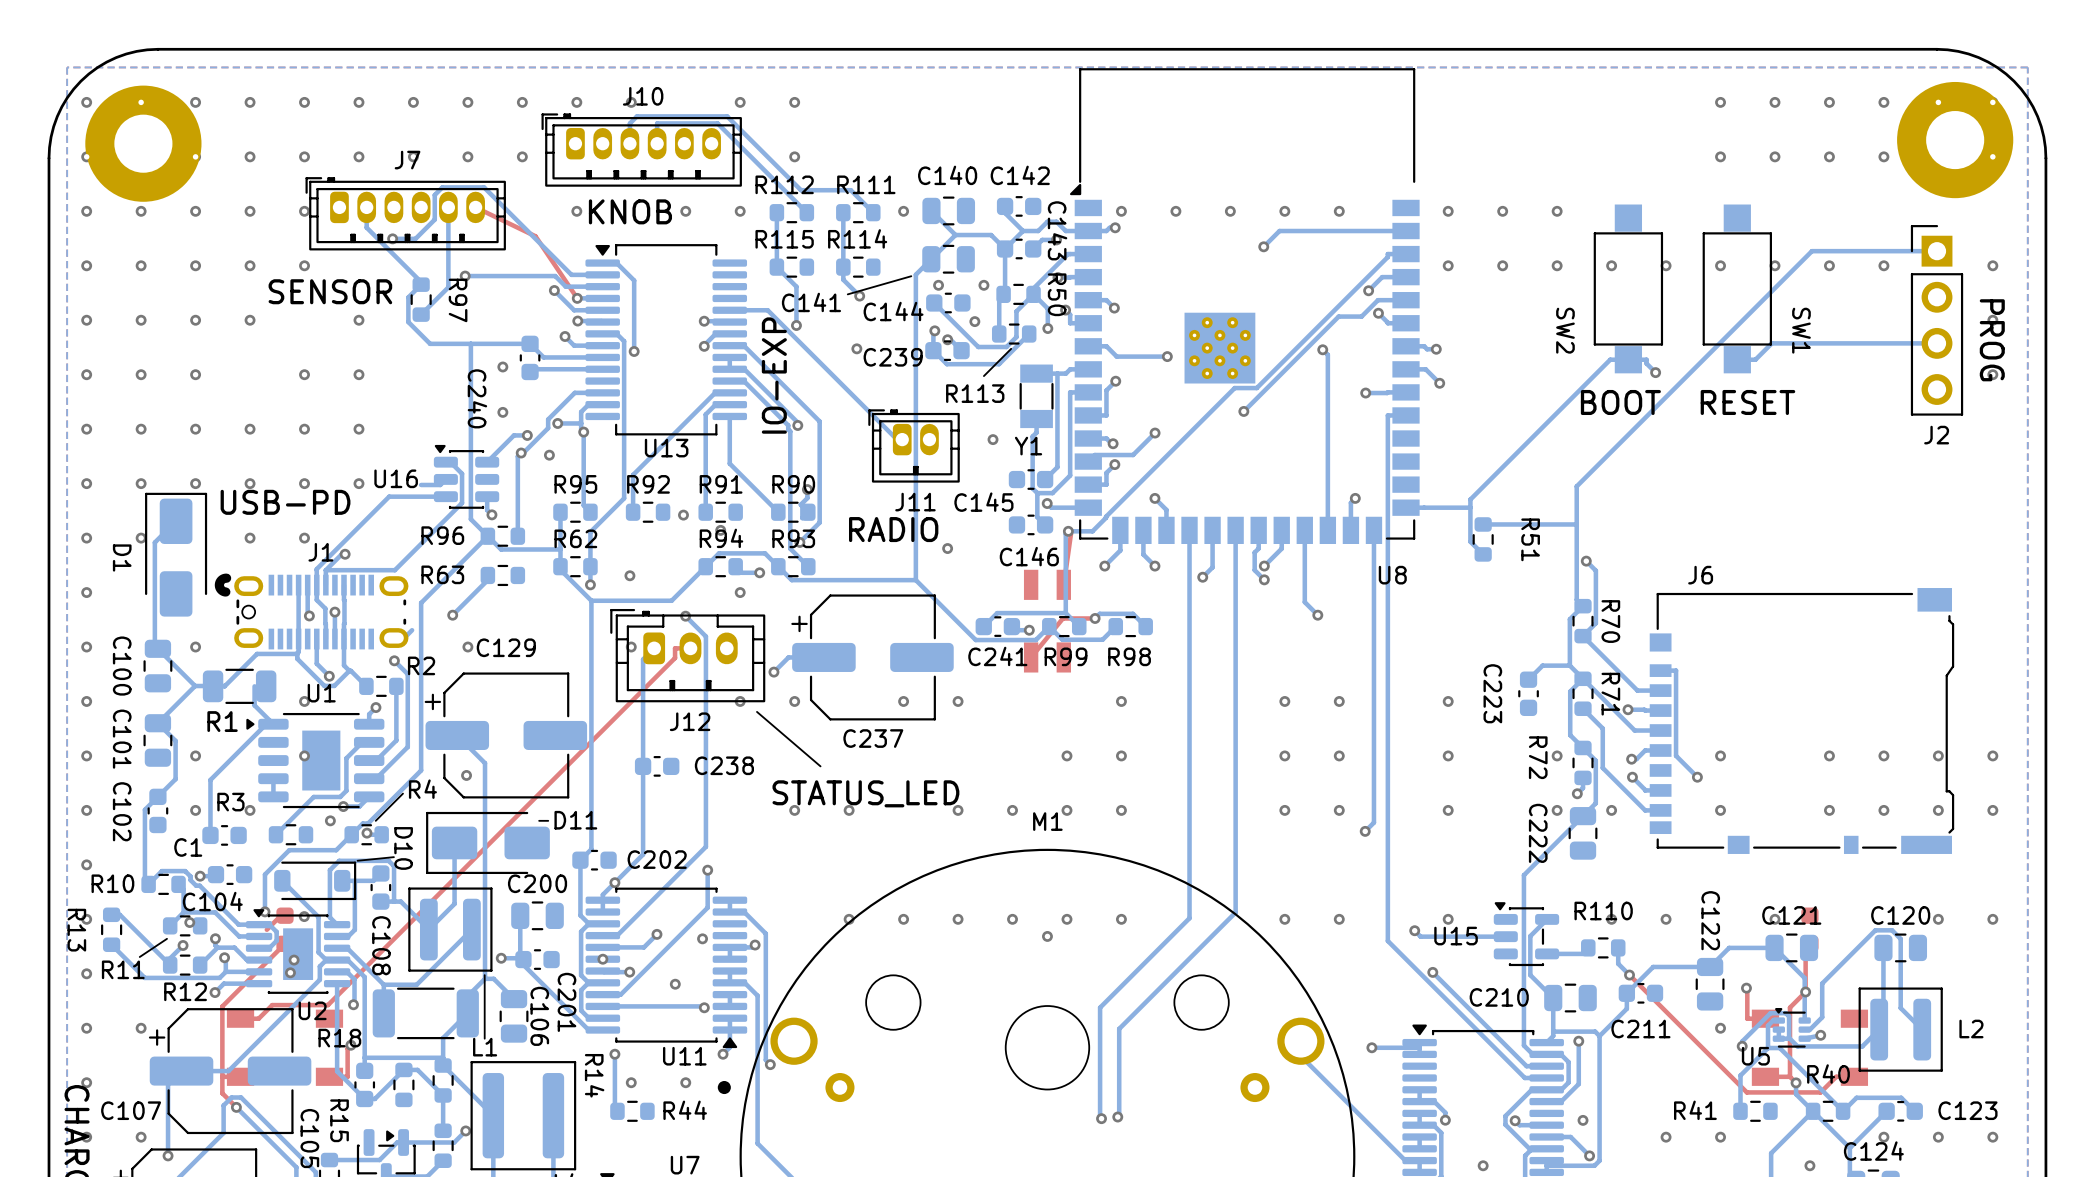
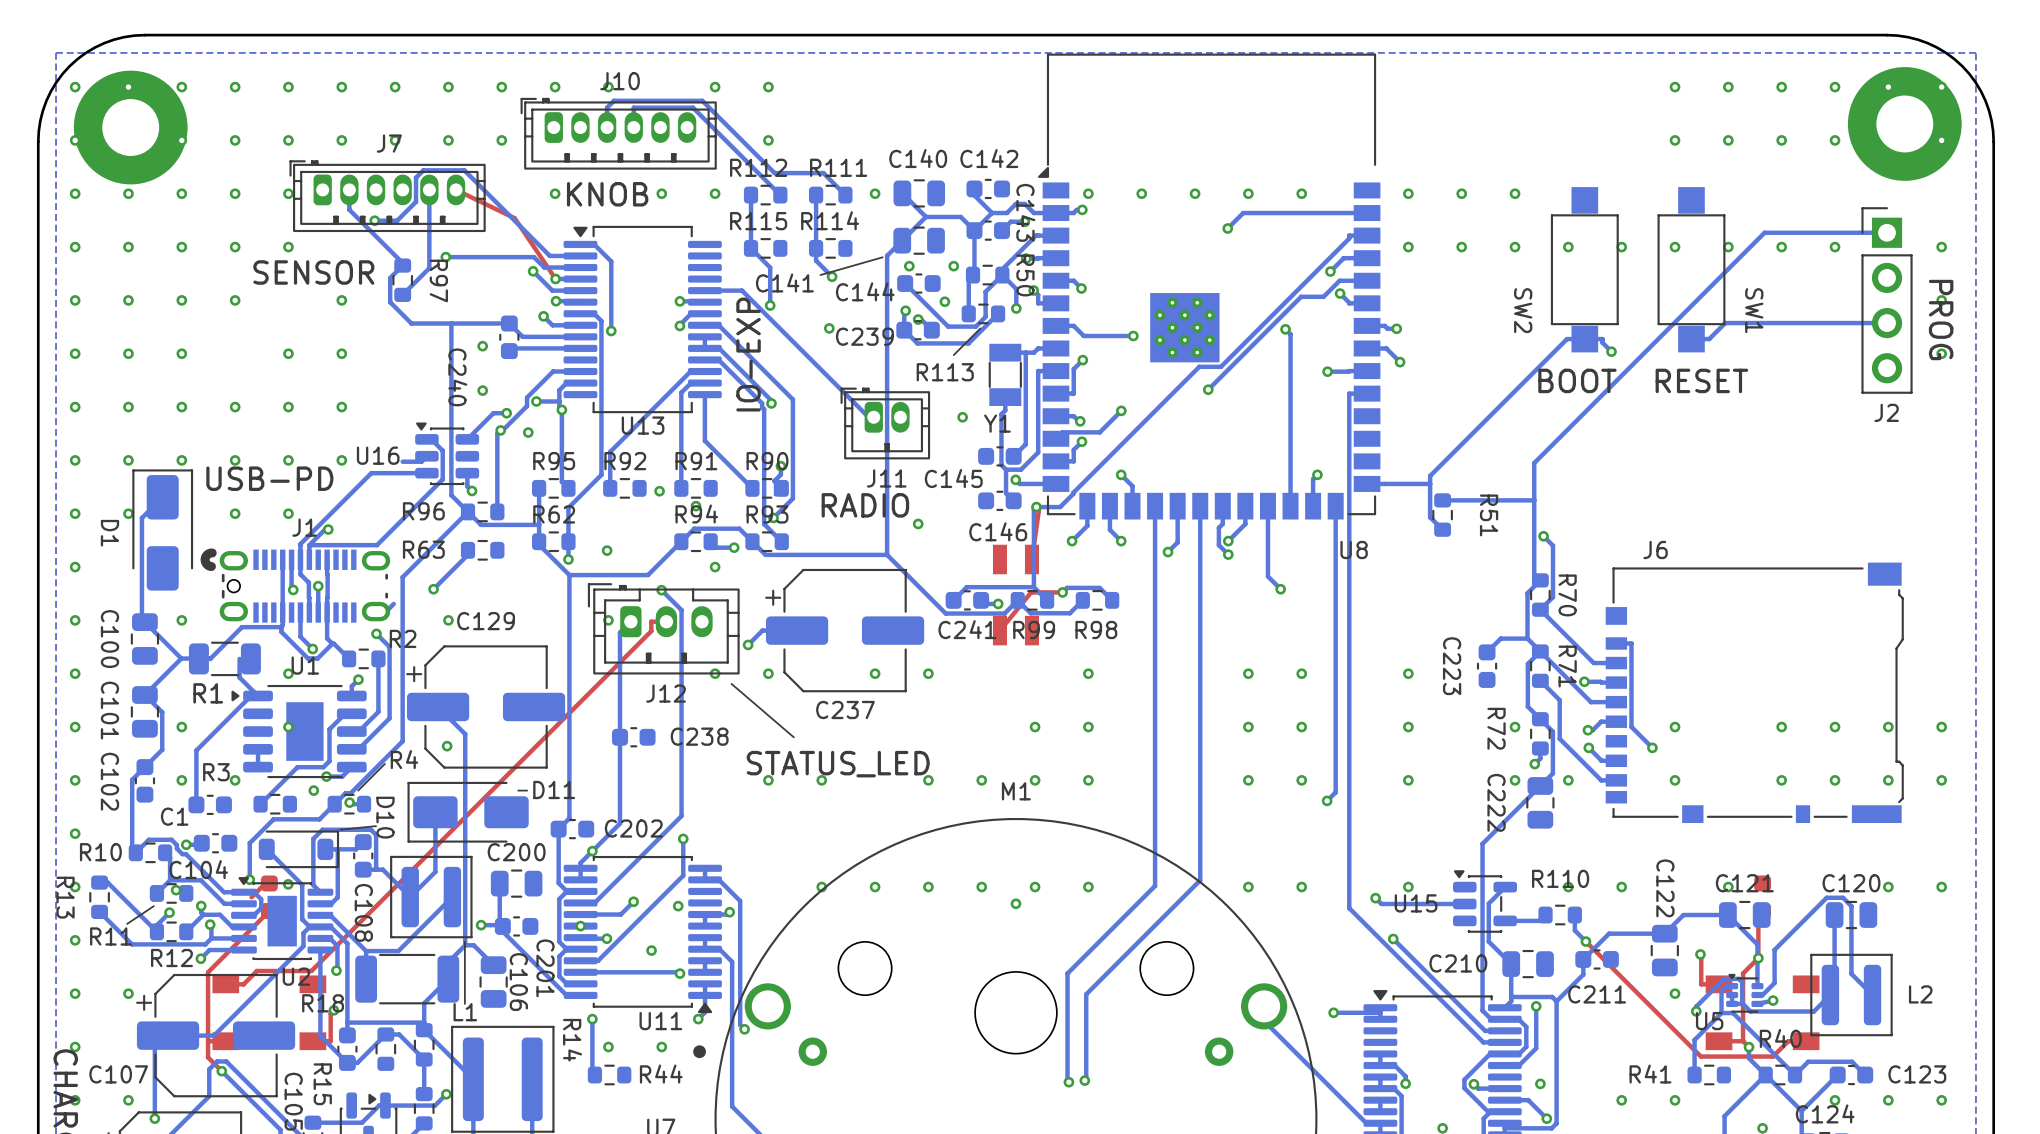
via: (294, 960) -> none
via: (290, 972) -> none

